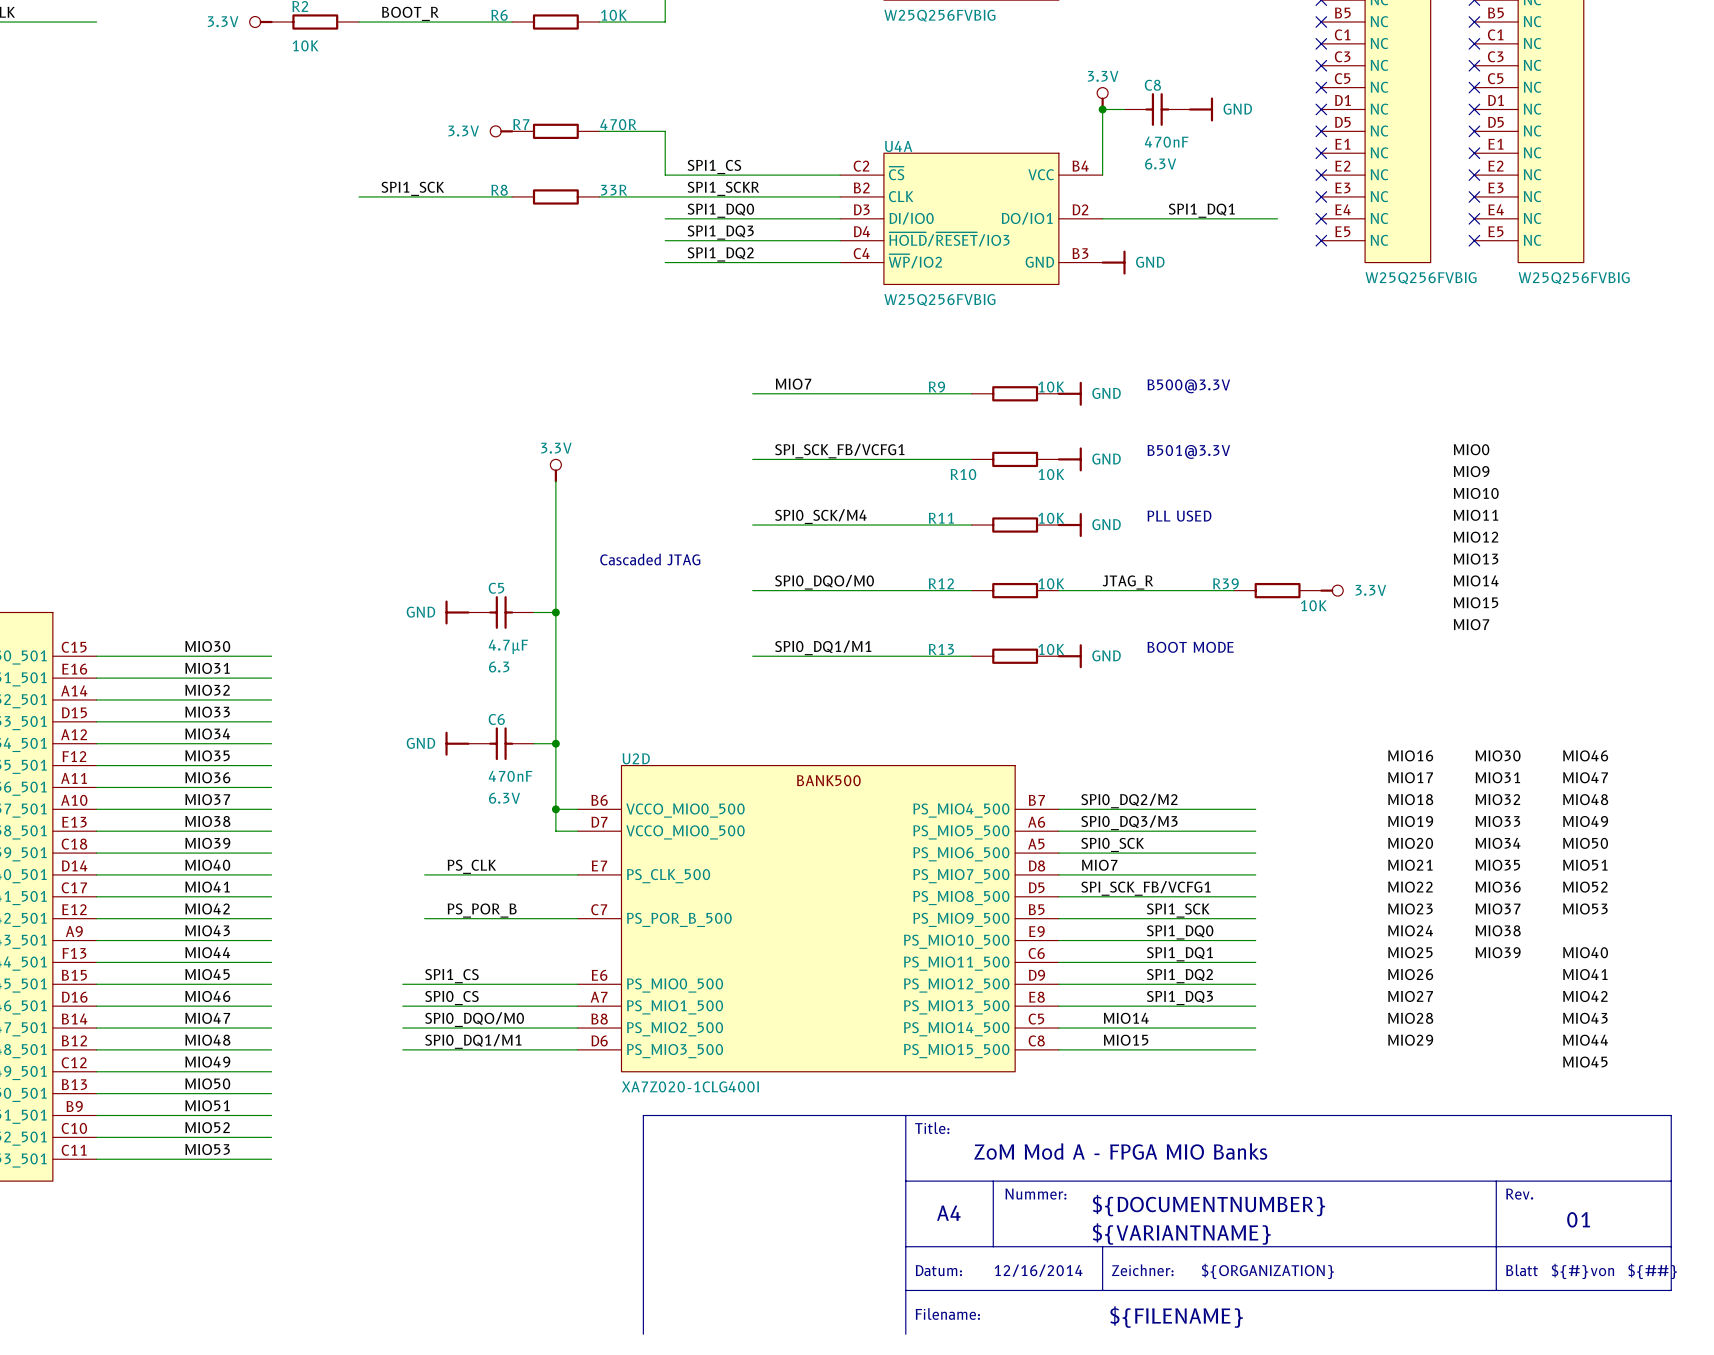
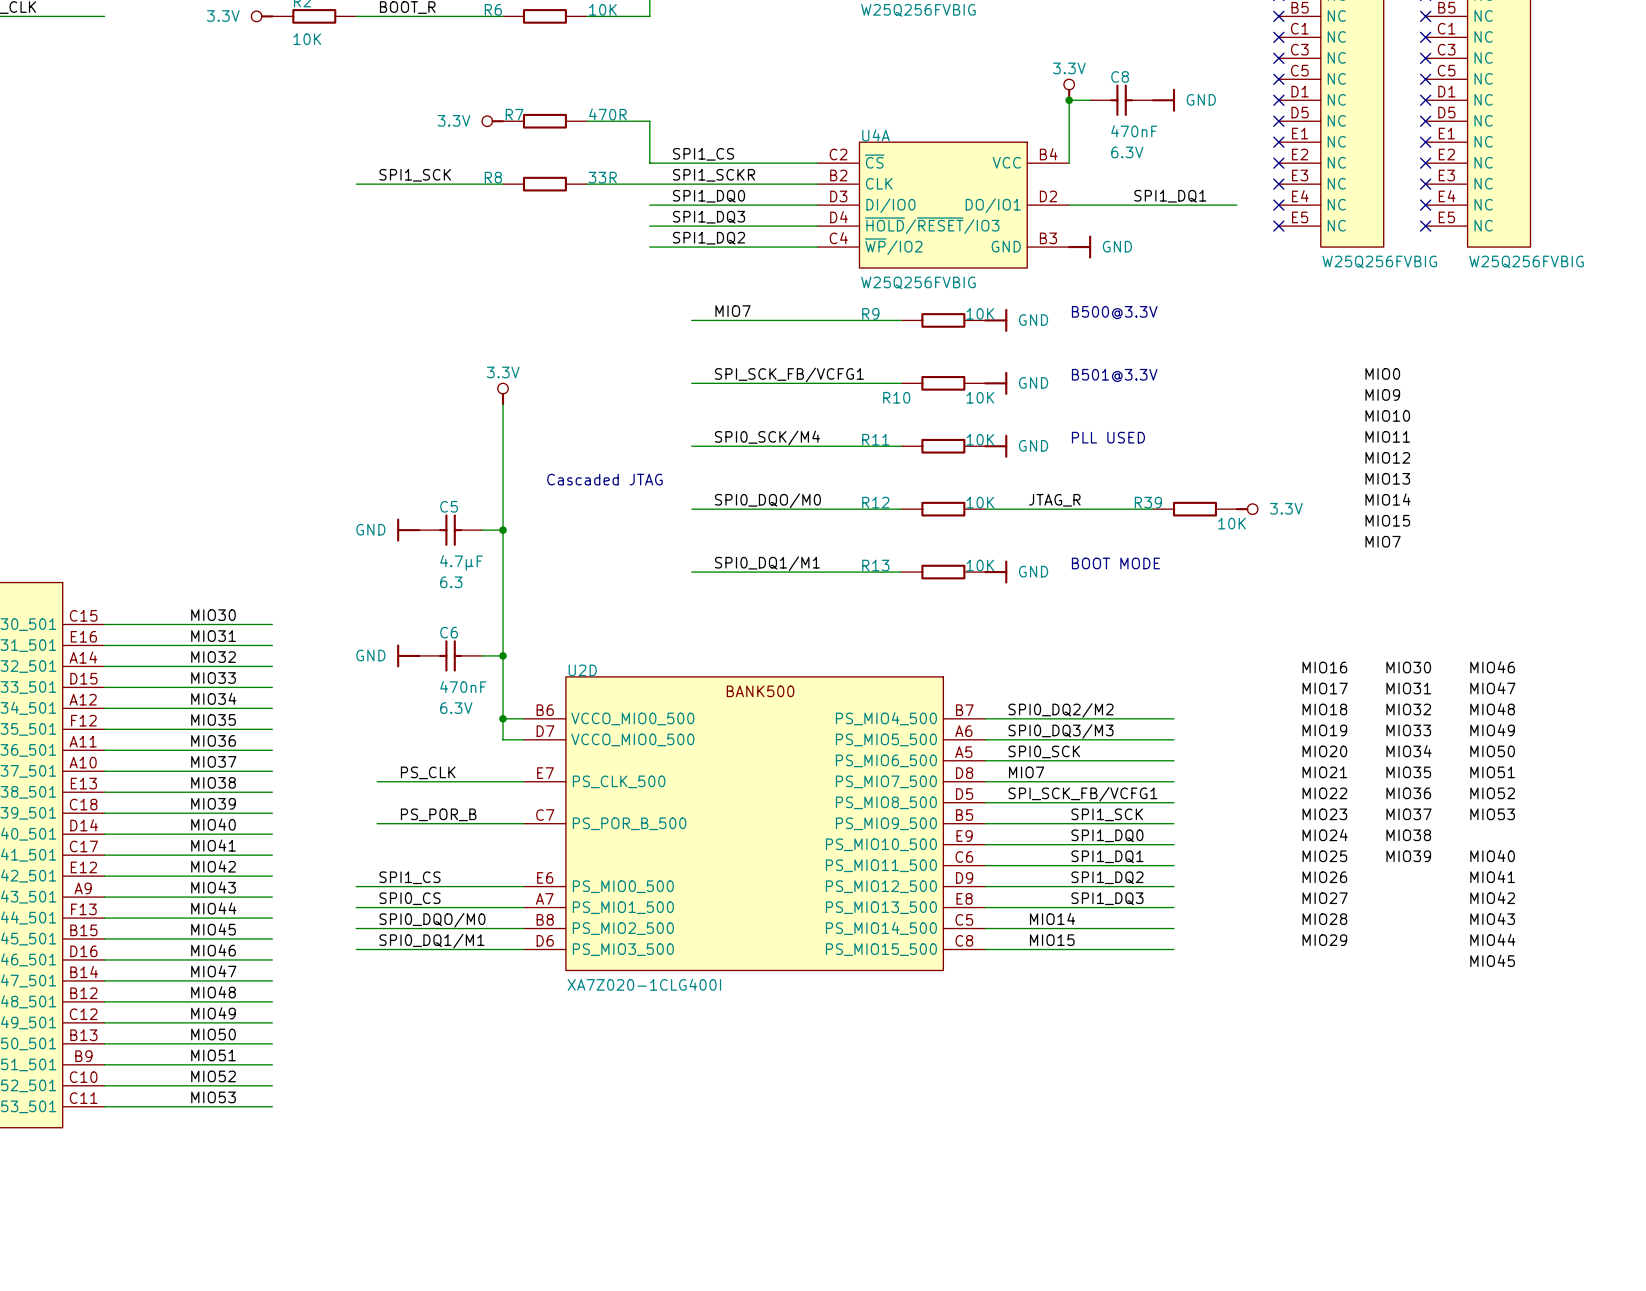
power symbol: none -> GND (995, 320)
label position: MIO7 (793, 384) -> MIO7 (733, 311)
text position: B500@3.3V (1188, 386) -> B500@3.3V (1114, 312)
wire: (752, 393) (971, 393) -> (691, 320) (901, 320)
R9 position: (1015, 393) -> (943, 320)
power symbol: GND (1069, 393) -> none
power symbol: none -> GND (995, 383)
label position: MIO0 (1471, 449) -> MIO0 (1382, 373)
label position: SPI_SCK_FB/VCFG1 (839, 450) -> SPI_SCK_FB/VCFG1 (789, 374)
text position: B501@3.3V (1188, 451) -> B501@3.3V (1114, 375)
wire: (752, 459) (971, 459) -> (691, 383) (901, 383)
R10 position: (1015, 459) -> (943, 383)
power symbol: GND (1069, 459) -> none
power symbol position: 3.3V (555, 470) -> 3.3V (503, 394)
power symbol: none -> GND (995, 446)
label position: MIO9 (1471, 471) -> MIO9 (1382, 394)
wire: (555, 481) (555, 831) (577, 831) -> (503, 404) (503, 739) (523, 739)
label position: MIO10 (1476, 493) -> MIO10 (1387, 415)
label position: MIO11 (1476, 515) -> MIO11 (1387, 436)
label position: SPI0_SCK/M4 (820, 516) -> SPI0_SCK/M4 (767, 437)
text position: PLL USED (1179, 516) -> PLL USED (1108, 437)
wire: (752, 525) (971, 525) -> (691, 446) (901, 446)
R11 position: (1015, 525) -> (943, 446)
power symbol: GND (1069, 525) -> none
label position: MIO12 (1476, 537) -> MIO12 (1387, 457)
power symbol: none -> GND (408, 530)
junction: none -> (503, 530)
text position: Cascaded JTAG (650, 559) -> Cascaded JTAG (604, 479)
label position: MIO13 (1476, 559) -> MIO13 (1387, 478)
label position: MIO14 (1476, 580) -> MIO14 (1388, 499)
label position: SPI0_DQO/M0 (824, 582) -> SPI0_DQO/M0 (767, 500)
label position: JTAG_R (1127, 582) -> JTAG_R (1054, 500)
wire: (752, 590) (971, 590) -> (691, 509) (901, 509)
R12 position: (1015, 590) -> (943, 509)
wire: (1058, 590) (1233, 590) -> (985, 509) (1153, 509)
R39 position: (1277, 590) -> (1194, 509)
power symbol position: 3.3V (1331, 590) -> 3.3V (1247, 509)
power symbol: none -> GND (995, 572)
label position: MIO15 (1476, 602) -> MIO15 (1387, 520)
power symbol: GND (457, 612) -> none
C5 position: (501, 612) -> (450, 530)
wire: (534, 612) (555, 612) -> (482, 530) (503, 530)
junction: (555, 612) -> none
label position: MIO7 (1471, 624) -> MIO7 (1383, 541)
label position: SPI0_DQ1/M1 (823, 647) -> SPI0_DQ1/M1 (767, 563)
text position: BOOT MODE (1190, 647) -> BOOT MODE (1115, 563)
wire: (752, 656) (971, 656) -> (691, 572) (901, 572)
R13 position: (1015, 656) -> (943, 572)
power symbol: GND (1069, 656) -> none
power symbol: none -> GND (408, 655)
junction: none -> (503, 655)
power symbol: GND (457, 743) -> none
C6 position: (501, 743) -> (450, 655)
wire: (534, 743) (555, 743) -> (482, 655) (503, 655)
junction: (555, 743) -> none
junction: none -> (503, 718)
label position: MIO16 (1410, 755) -> MIO16 (1324, 667)
label position: MIO30 (1498, 755) -> MIO30 (1408, 667)
label position: MIO46 (1585, 755) -> MIO46 (1492, 667)
label position: MIO17 (1410, 777) -> MIO17 (1325, 688)
label position: MIO31 (1497, 777) -> MIO31 (1408, 688)
label position: MIO47 (1585, 777) -> MIO47 (1492, 688)
label position: MIO18 (1410, 799) -> MIO18 (1324, 709)
label position: MIO32 (1497, 799) -> MIO32 (1408, 709)
label position: MIO48 (1585, 799) -> MIO48 (1492, 709)
label position: SPI0_DQ2/M2 (1129, 800) -> SPI0_DQ2/M2 (1061, 710)
wire: (555, 809) (577, 809) -> (503, 718) (523, 718)
junction: (555, 809) -> none
wire: (1058, 809) (1255, 809) -> (985, 718) (1174, 718)
label position: MIO19 (1410, 821) -> MIO19 (1324, 730)
label position: MIO33 (1497, 821) -> MIO33 (1408, 730)
label position: MIO49 (1585, 821) -> MIO49 (1492, 730)
label position: SPI0_DQ3/M3 (1129, 822) -> SPI0_DQ3/M3 (1061, 731)
wire: (1058, 831) (1255, 831) -> (985, 739) (1174, 739)
label position: MIO20 (1410, 843) -> MIO20 (1324, 751)
label position: MIO34 (1498, 843) -> MIO34 (1408, 751)
label position: MIO50 (1585, 843) -> MIO50 (1492, 751)
label position: SPI0_SCK (1112, 844) -> SPI0_SCK (1044, 751)
wire: (1058, 853) (1255, 853) -> (985, 760) (1174, 760)
label position: MIO7 (1099, 865) -> MIO7 (1026, 772)
label position: MIO21 (1410, 865) -> MIO21 (1324, 772)
label position: MIO35 (1497, 865) -> MIO35 (1408, 772)
label position: MIO51 (1585, 865) -> MIO51 (1492, 772)
label position: PS_CLK (471, 866) -> PS_CLK (428, 772)
wire: (424, 874) (577, 874) -> (377, 781) (523, 781)
wire: (1058, 874) (1255, 874) -> (985, 781) (1174, 781)
label position: MIO22 (1410, 887) -> MIO22 (1324, 793)
label position: MIO36 (1498, 887) -> MIO36 (1408, 793)
label position: MIO52 (1585, 887) -> MIO52 (1492, 793)
label position: SPI_SCK_FB/VCFG1 (1145, 888) -> SPI_SCK_FB/VCFG1 (1082, 794)
wire: (1058, 896) (1255, 896) -> (985, 802) (1174, 802)
label position: MIO23 (1410, 908) -> MIO23 (1324, 814)
label position: MIO37 (1498, 908) -> MIO37 (1408, 814)
label position: MIO53 (1585, 908) -> MIO53 (1492, 814)
label position: PS_POR_B (482, 910) -> PS_POR_B (438, 814)
label position: SPI1_SCK (1178, 910) -> SPI1_SCK (1107, 814)
wire: (424, 918) (577, 918) -> (377, 823) (523, 823)
U2D position: (818, 918) -> (754, 823)
wire: (1058, 918) (1255, 918) -> (985, 823) (1174, 823)
label position: MIO24 (1410, 930) -> MIO24 (1325, 835)
label position: MIO38 (1498, 930) -> MIO38 (1408, 835)
label position: SPI1_DQ0 (1180, 932) -> SPI1_DQ0 (1107, 835)
wire: (1058, 940) (1255, 940) -> (985, 844) (1174, 844)
label position: MIO25 (1410, 952) -> MIO25 (1324, 856)
label position: MIO39 (1498, 952) -> MIO39 (1408, 856)
label position: MIO40 (1585, 952) -> MIO40 (1492, 856)
label position: SPI1_DQ1 (1179, 954) -> SPI1_DQ1 (1107, 856)
wire: (1058, 962) (1255, 962) -> (985, 865) (1174, 865)
label position: MIO26 (1410, 974) -> MIO26 (1324, 877)
label position: MIO41 (1585, 974) -> MIO41 (1492, 876)
label position: SPI1_CS (451, 976) -> SPI1_CS (409, 877)
label position: SPI1_DQ2 (1179, 976) -> SPI1_DQ2 (1107, 877)
wire: (402, 984) (577, 984) -> (356, 886) (523, 886)
wire: (1058, 984) (1255, 984) -> (985, 886) (1174, 886)
label position: MIO27 (1410, 996) -> MIO27 (1325, 898)
label position: MIO42 (1585, 996) -> MIO42 (1492, 897)
label position: SPI0_CS (451, 998) -> SPI0_CS (409, 898)
label position: SPI1_DQ3 (1179, 998) -> SPI1_DQ3 (1107, 898)
wire: (402, 1006) (577, 1006) -> (356, 907) (523, 907)
wire: (1058, 1006) (1255, 1006) -> (985, 907) (1174, 907)
label position: MIO14 (1126, 1018) -> MIO14 (1052, 918)
label position: MIO28 (1410, 1018) -> MIO28 (1324, 919)
label position: MIO43 (1585, 1018) -> MIO43 (1492, 918)
label position: SPI0_DQO/M0 (474, 1019) -> SPI0_DQO/M0 (432, 920)
wire: (402, 1028) (577, 1028) -> (356, 928) (523, 928)
wire: (1058, 1028) (1255, 1028) -> (985, 928) (1174, 928)
label position: MIO15 (1126, 1040) -> MIO15 (1052, 940)
label position: MIO29 (1410, 1040) -> MIO29 (1324, 940)
label position: MIO44 (1585, 1040) -> MIO44 (1492, 939)
label position: SPI0_DQ1/M1 (473, 1041) -> SPI0_DQ1/M1 (431, 941)
wire: (402, 1049) (577, 1049) -> (356, 949) (523, 949)
wire: (1058, 1049) (1255, 1049) -> (985, 949) (1174, 949)
label position: MIO45 (1585, 1062) -> MIO45 (1492, 960)
line: (905, 1115) (905, 1334) -> none
text: Title: (932, 1128) -> none
text: ZoM Mod A - FPGA MIO Banks (1120, 1151) -> none
line: (905, 1181) (1671, 1181) -> none
line: (993, 1181) (993, 1246) -> none
line: (1496, 1181) (1496, 1290) -> none
text: Nummer: (1035, 1194) -> none
text: Rev. (1519, 1194) -> none
text: ${DOCUMENTNUMBER} (1208, 1205) -> none
text: A4 (948, 1213) -> none
text: 01 (1578, 1219) -> none
text: ${VARIANTNAME} (1181, 1233) -> none
line: (905, 1246) (1671, 1246) -> none
line: (1102, 1246) (1102, 1290) -> none
text: Datum: (938, 1270) -> none
text: 12/16/2014 (1038, 1270) -> none
text: Zeichner: (1142, 1270) -> none
text: Blatt (1522, 1270) -> none
text: ${ORGANIZATION} (1267, 1271) -> none
text: ${#} (1569, 1271) -> none
text: ${##} (1652, 1271) -> none
text: von (1602, 1272) -> none
line: (905, 1290) (1671, 1290) (1671, 1115) (643, 1115) (643, 1334) -> none
text: Filename: (947, 1314) -> none
text: ${FILENAME} (1176, 1317) -> none

